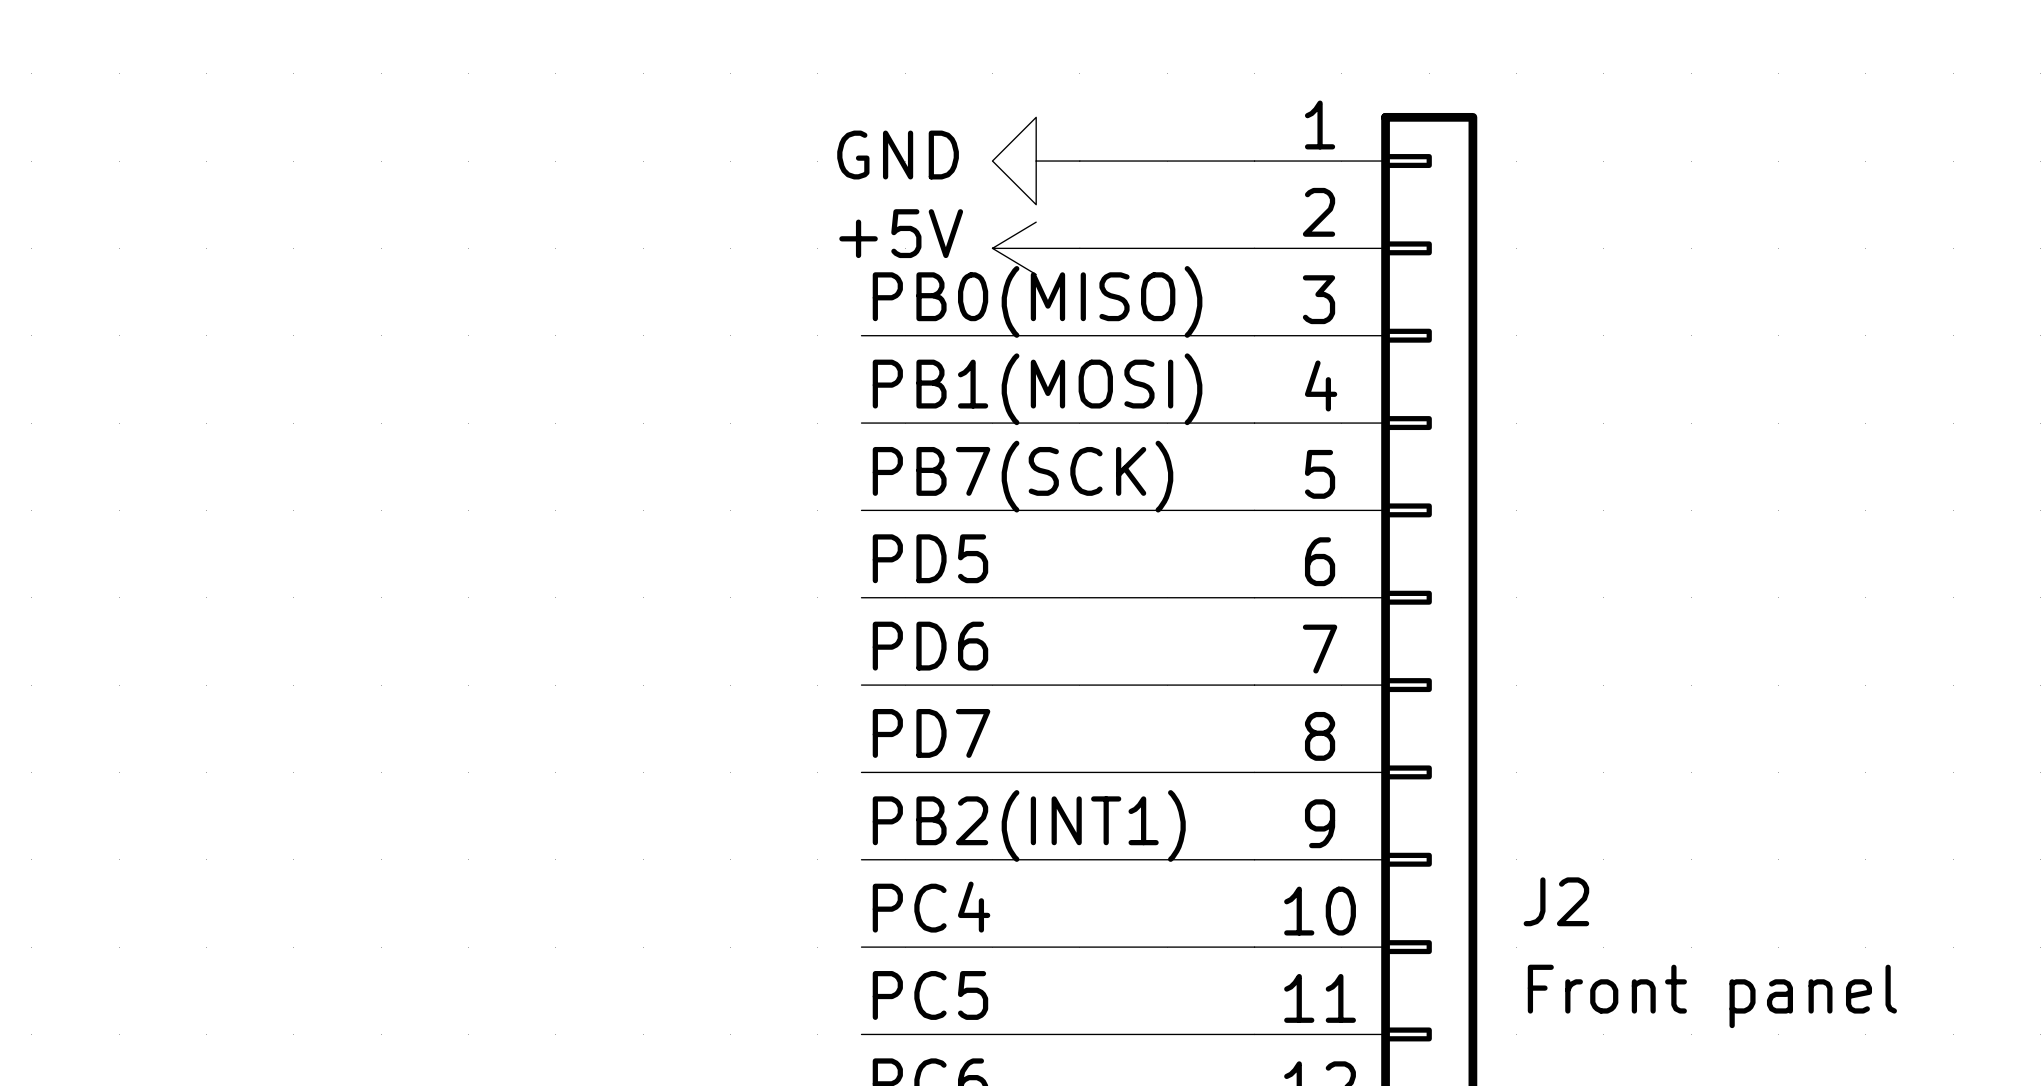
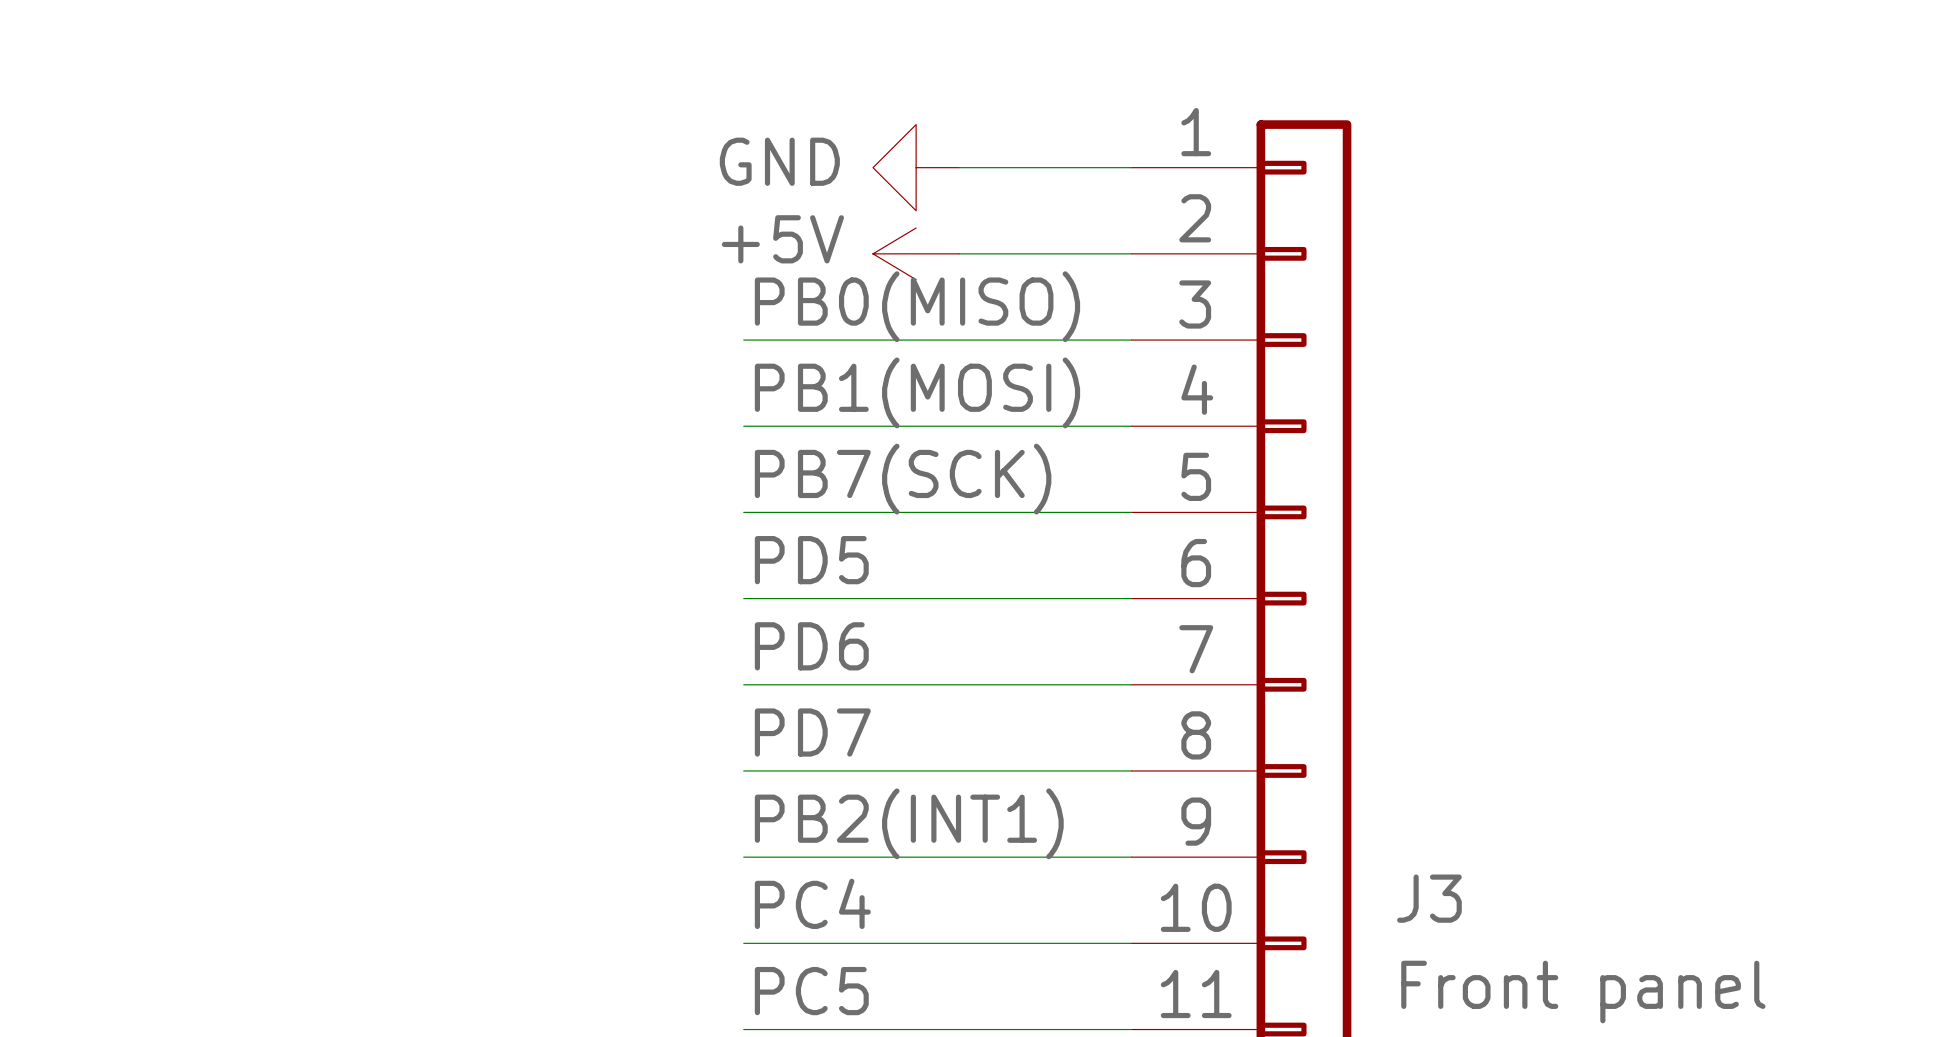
J2 name: J2 (1556, 901) -> J3 (1429, 898)

